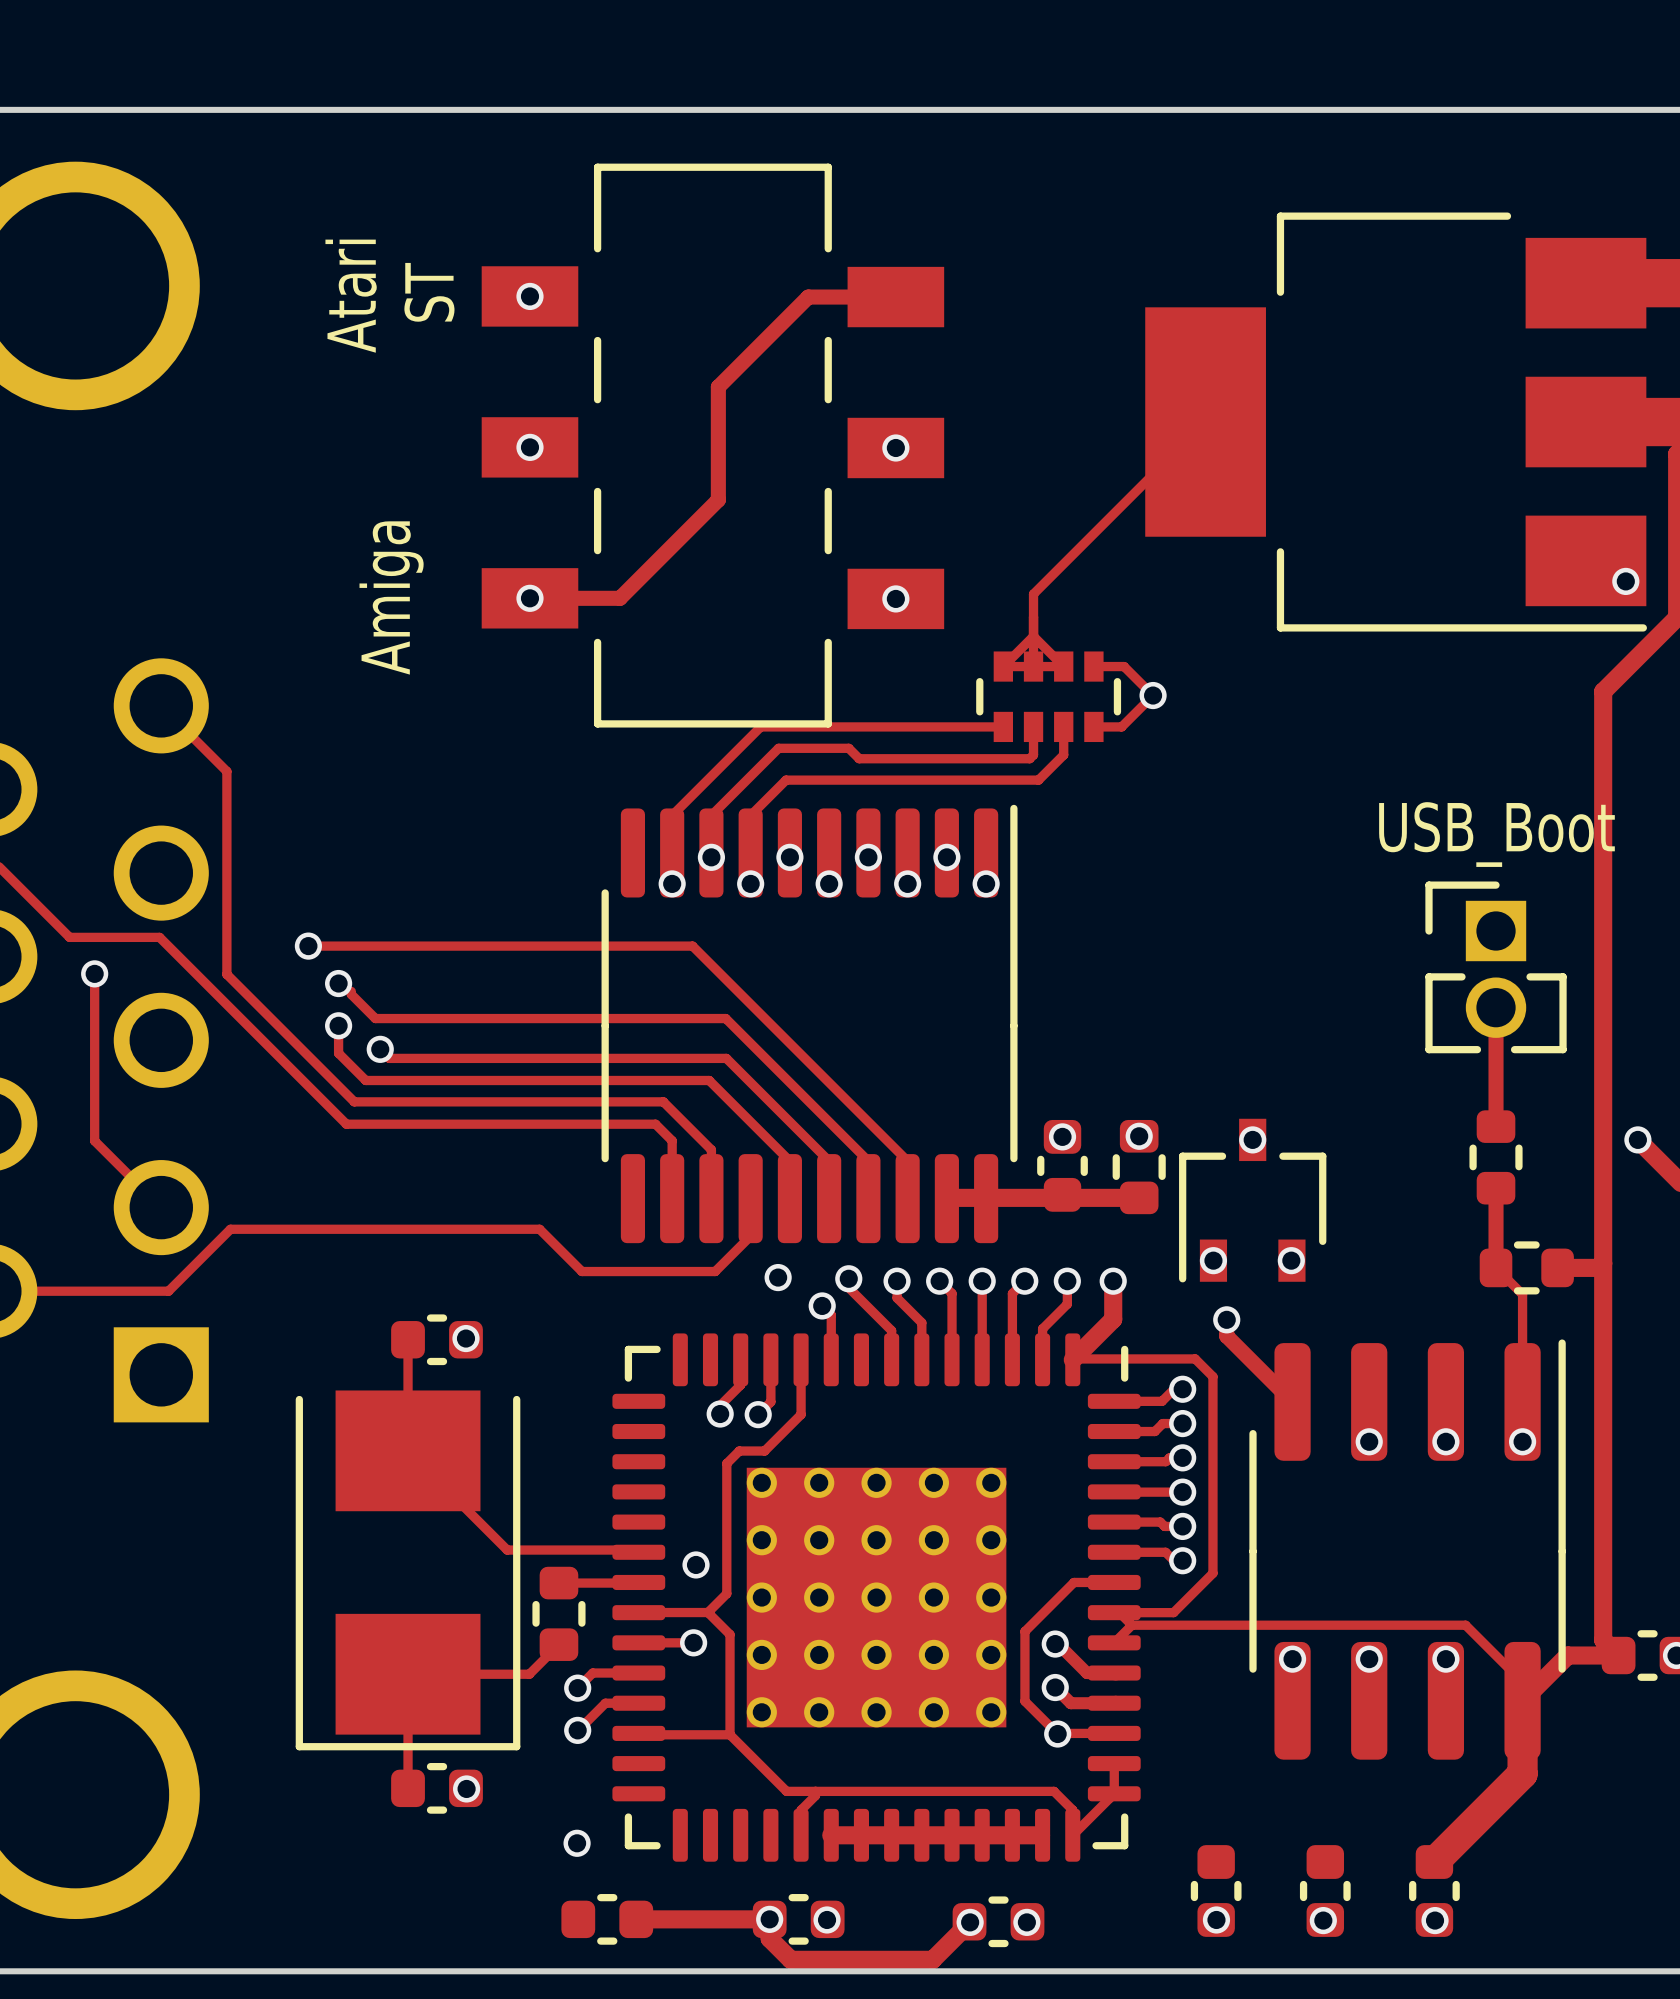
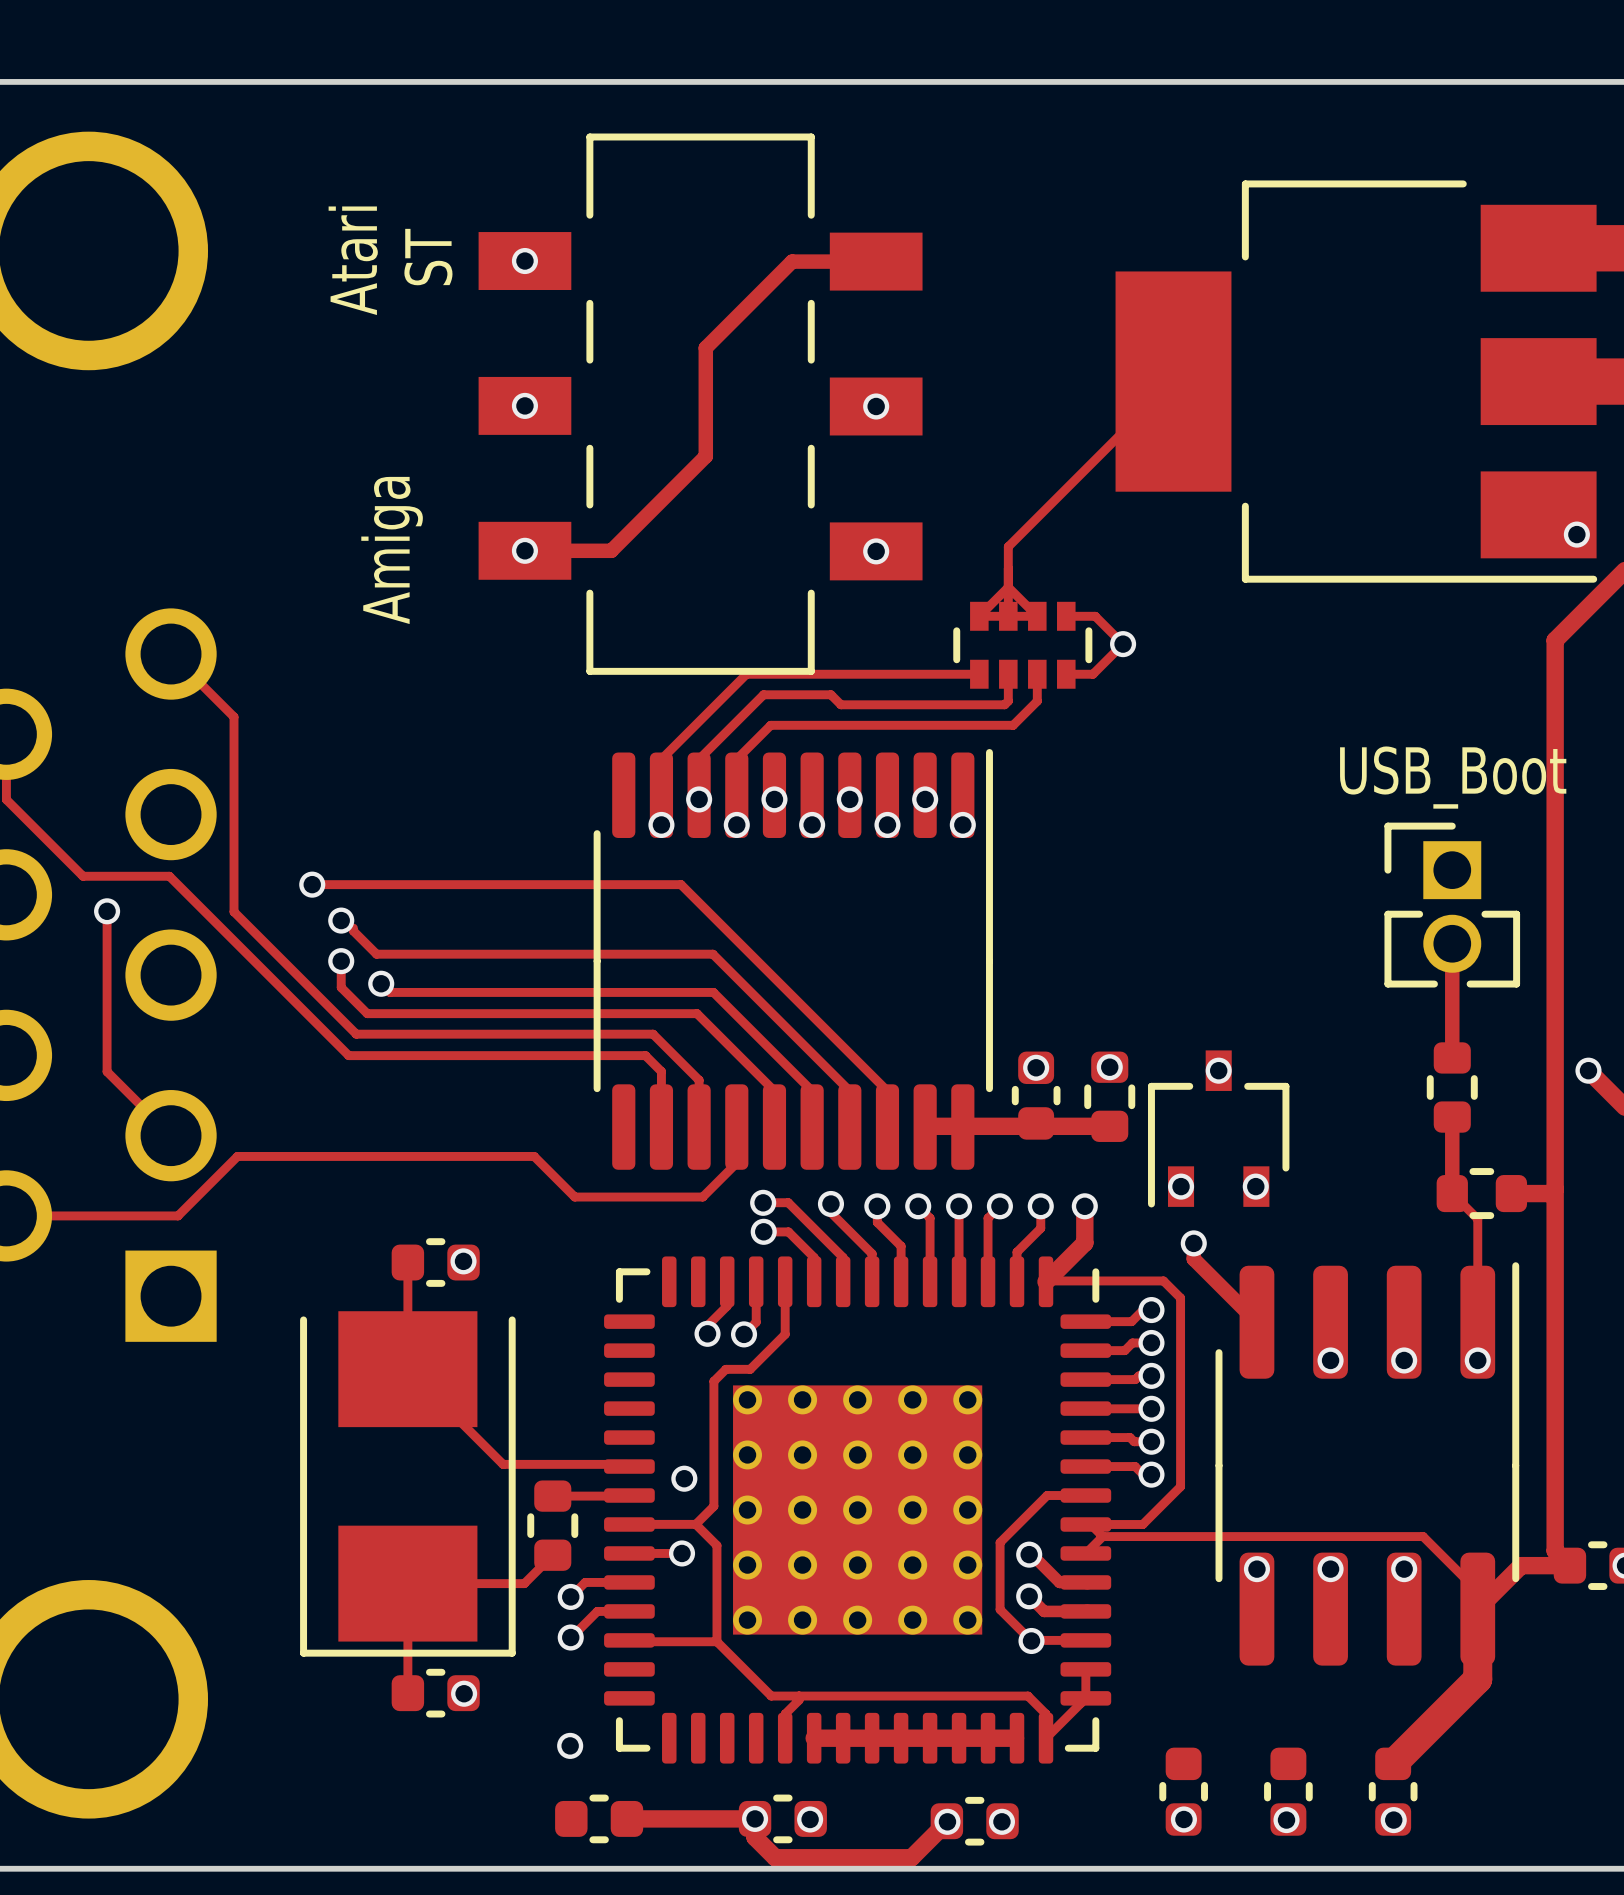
track: none -> (763, 1202) (788, 1202) (843, 1257) (843, 1281)
track: (822, 1305) (831, 1315) (831, 1334) -> (763, 1231) (788, 1231) (814, 1257)
via position: (822, 1305) -> (763, 1231)

